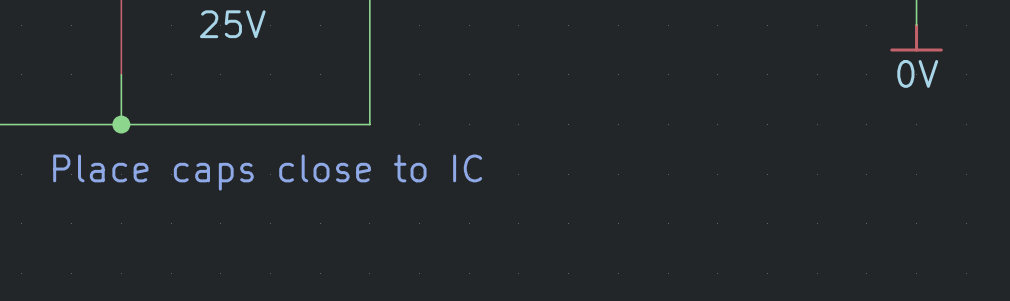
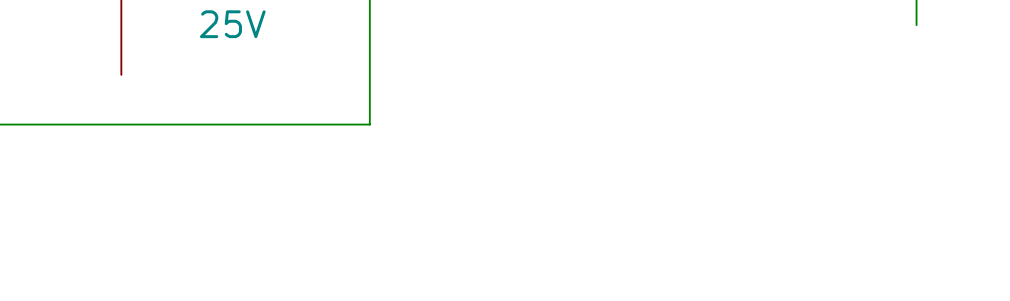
power symbol: 0V (916, 37) -> none
wire: (121, 74) (121, 124) -> none
junction: (121, 124) -> none
text: Place caps close to IC (267, 172) -> none

